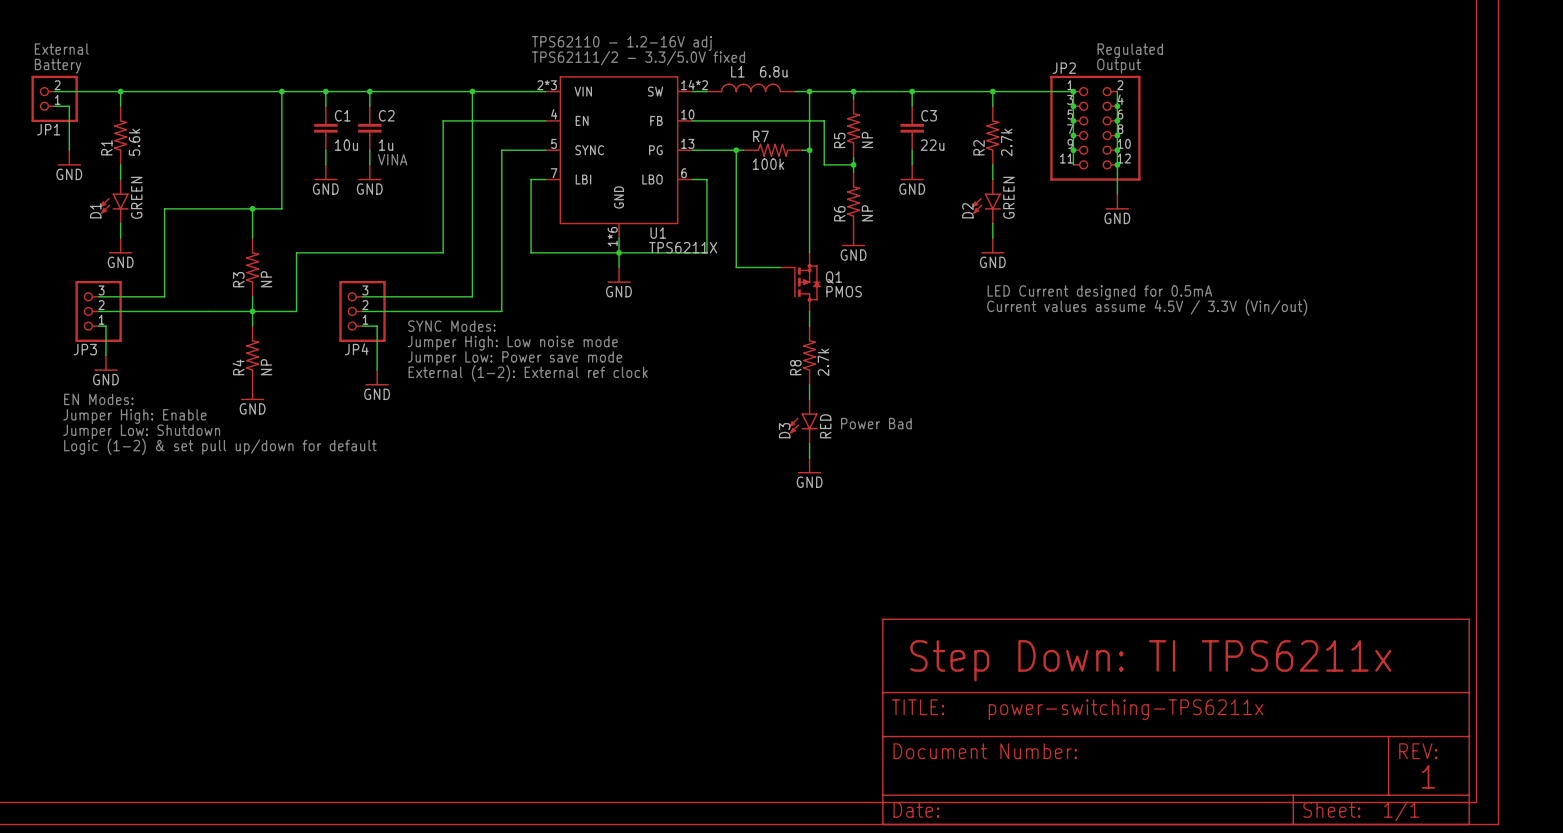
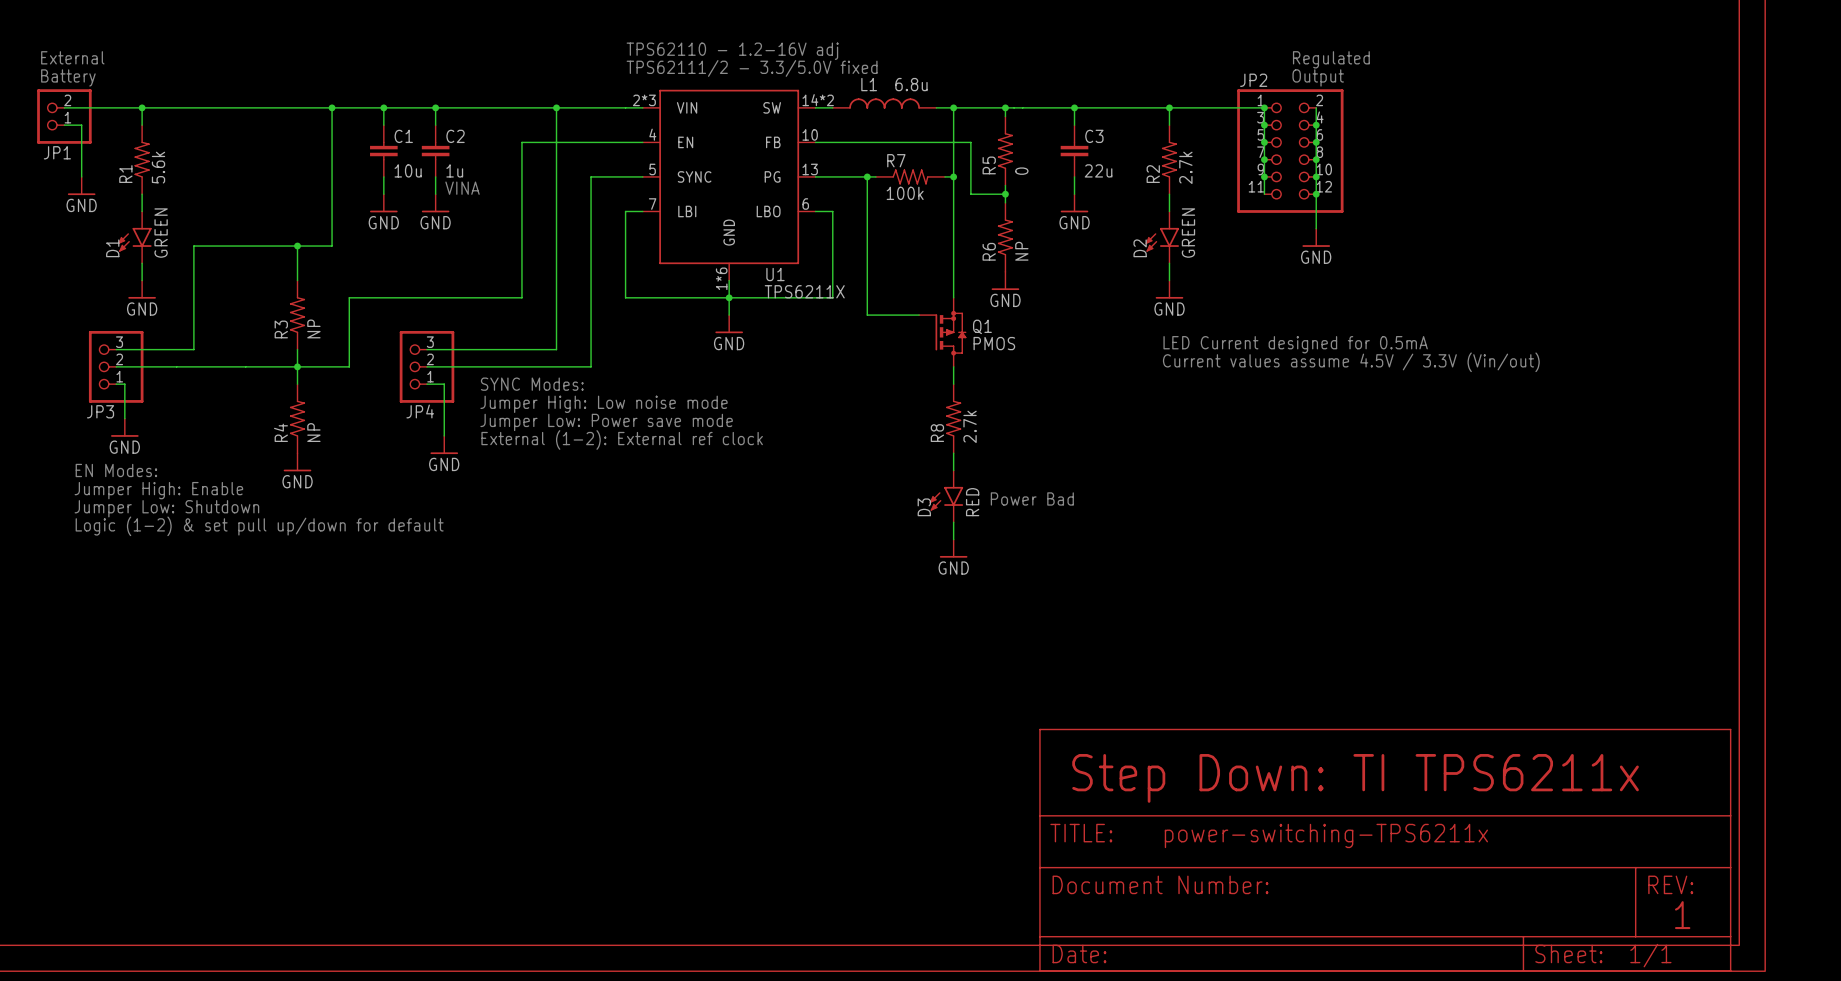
R5 value: NP (867, 140) -> 0 (1021, 171)

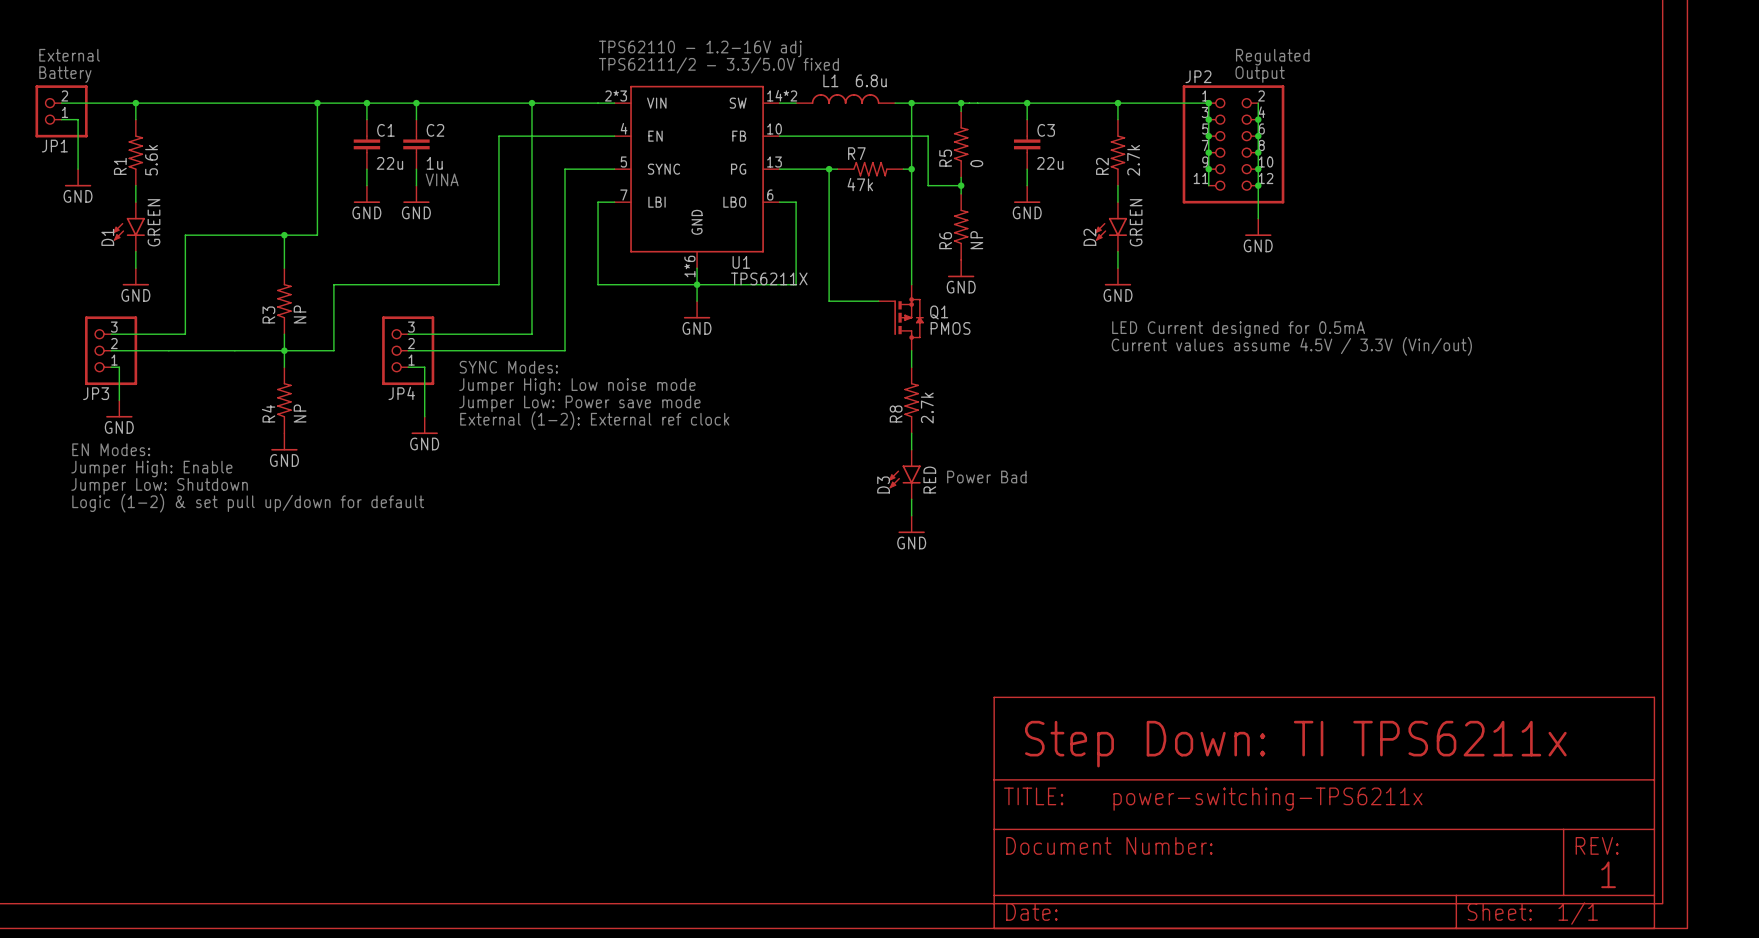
C1 value: 10u (408, 170) -> 22u (389, 163)
R7 value: 100k (905, 193) -> 47k (860, 184)

